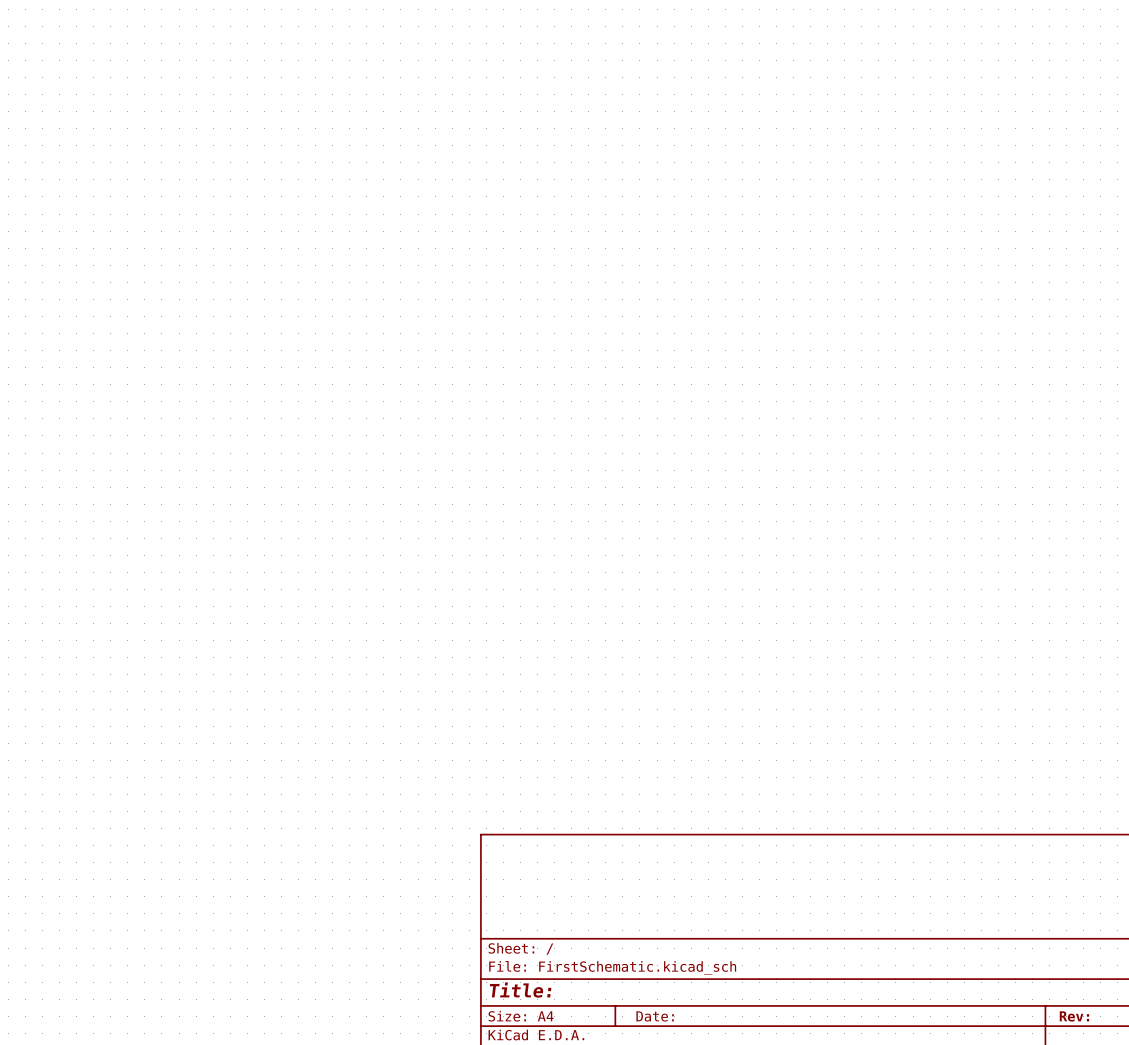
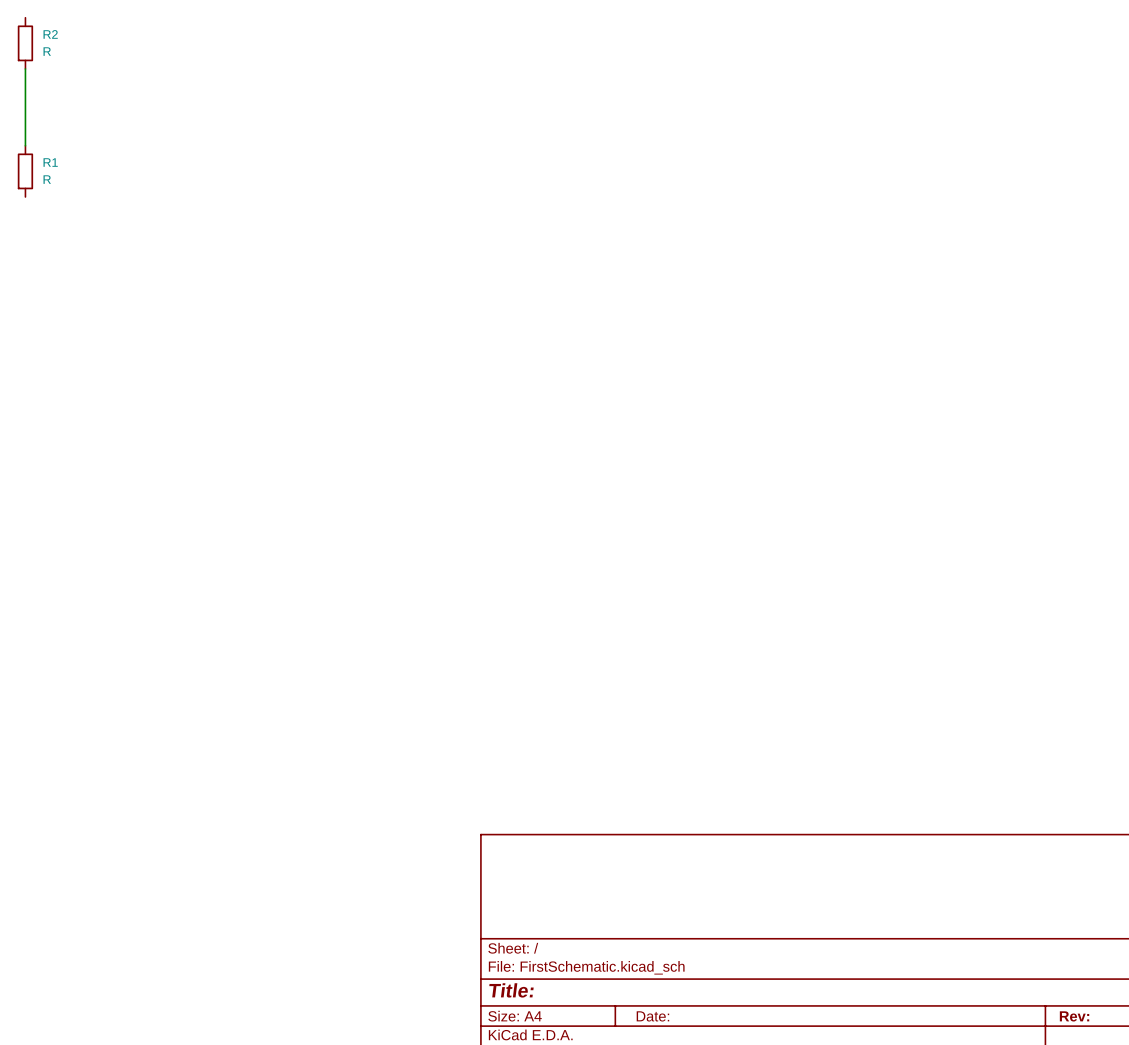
R2: none -> R (25, 43)
wire: none -> (25, 68) (25, 145)
R1: none -> R (25, 171)

